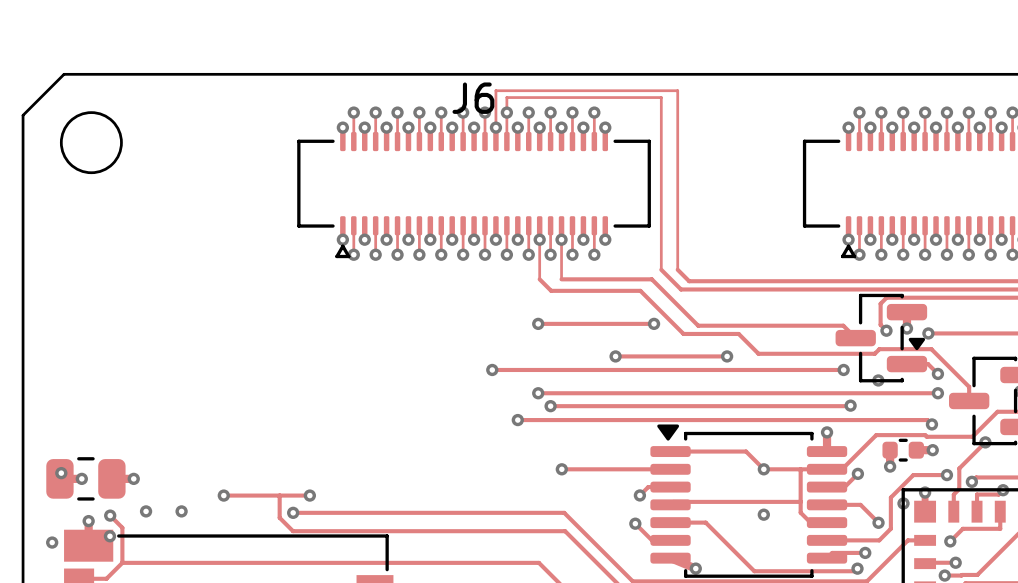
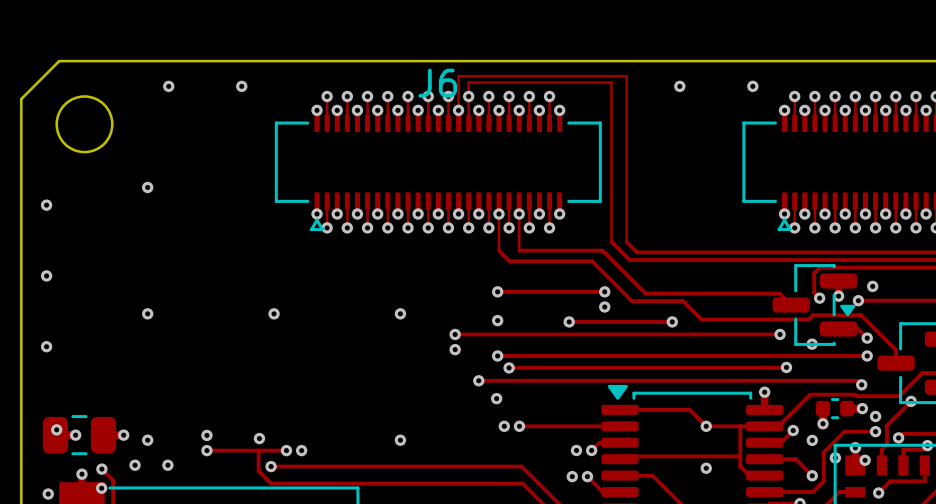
via: none -> (168, 86)
via: none -> (241, 86)
via: none -> (679, 86)
via: none -> (752, 86)
via: none -> (147, 187)
via: none -> (46, 205)
via: none -> (46, 275)
via: none -> (872, 286)
via: none -> (604, 307)
via: none -> (147, 313)
via: none -> (274, 313)
via: none -> (400, 313)
via: none -> (497, 320)
via: none -> (46, 346)
via: none -> (455, 349)
via: none -> (496, 398)
via: none -> (875, 416)
via: none -> (504, 426)
via: none -> (206, 435)
via: none -> (259, 438)
via: none -> (147, 440)
via: none -> (400, 440)
via: none -> (812, 440)
via: none -> (301, 450)
via: none -> (576, 450)
via: none -> (865, 460)
via: none -> (572, 476)

